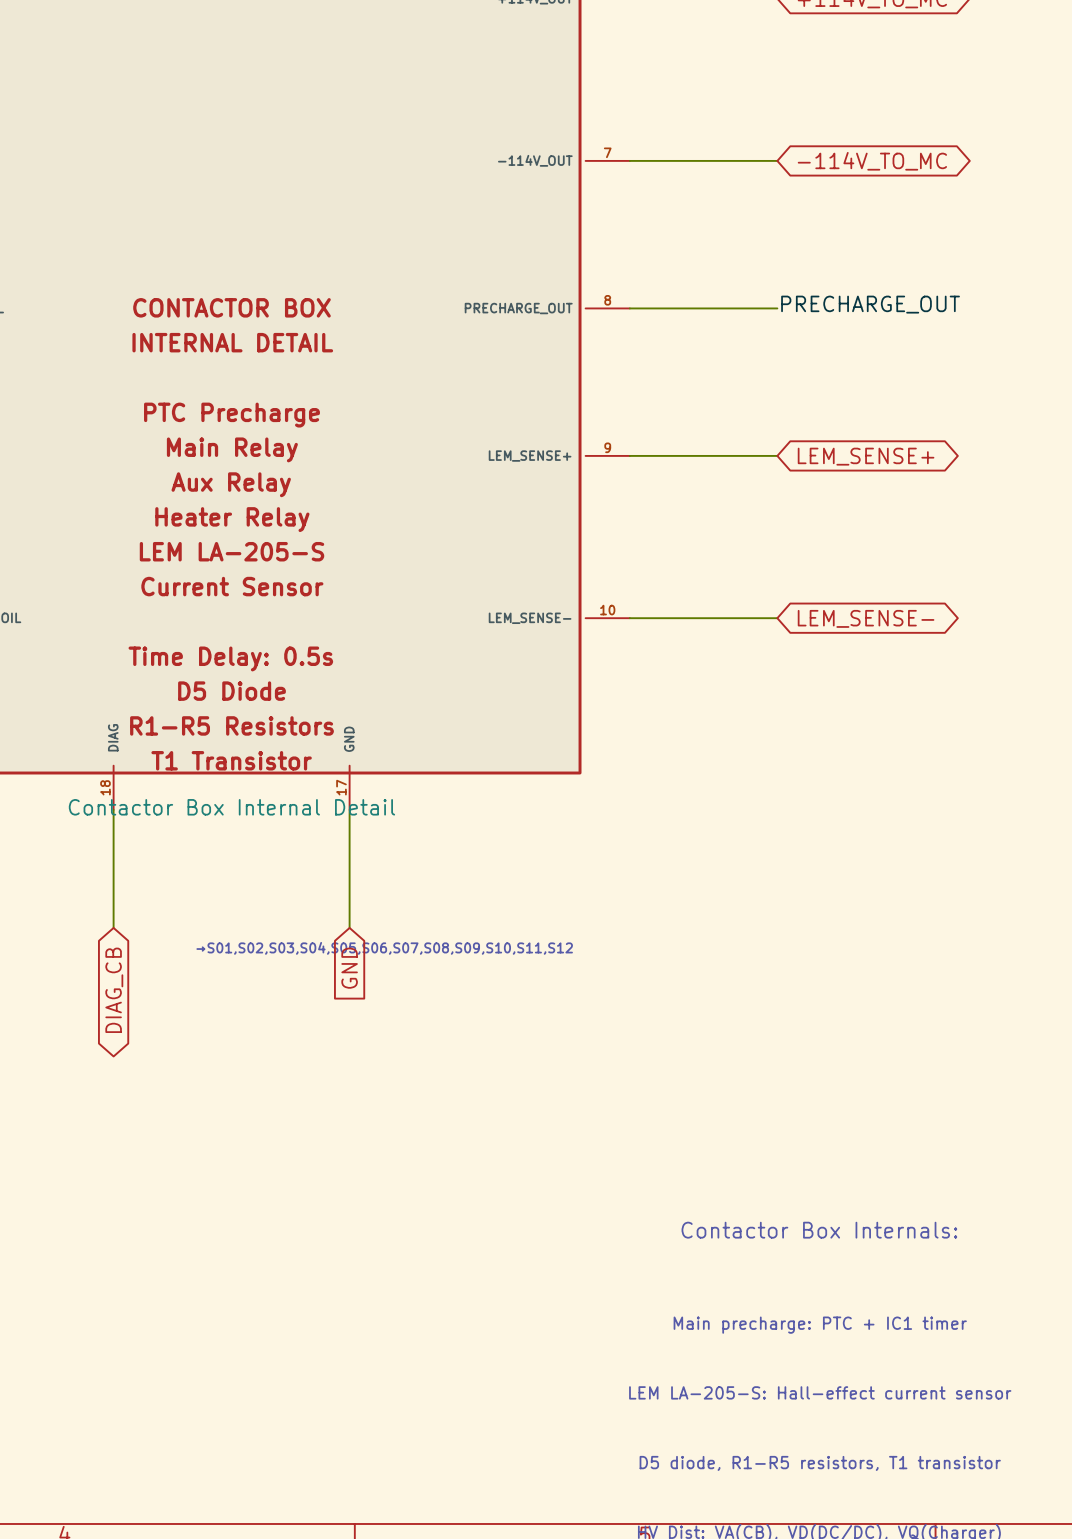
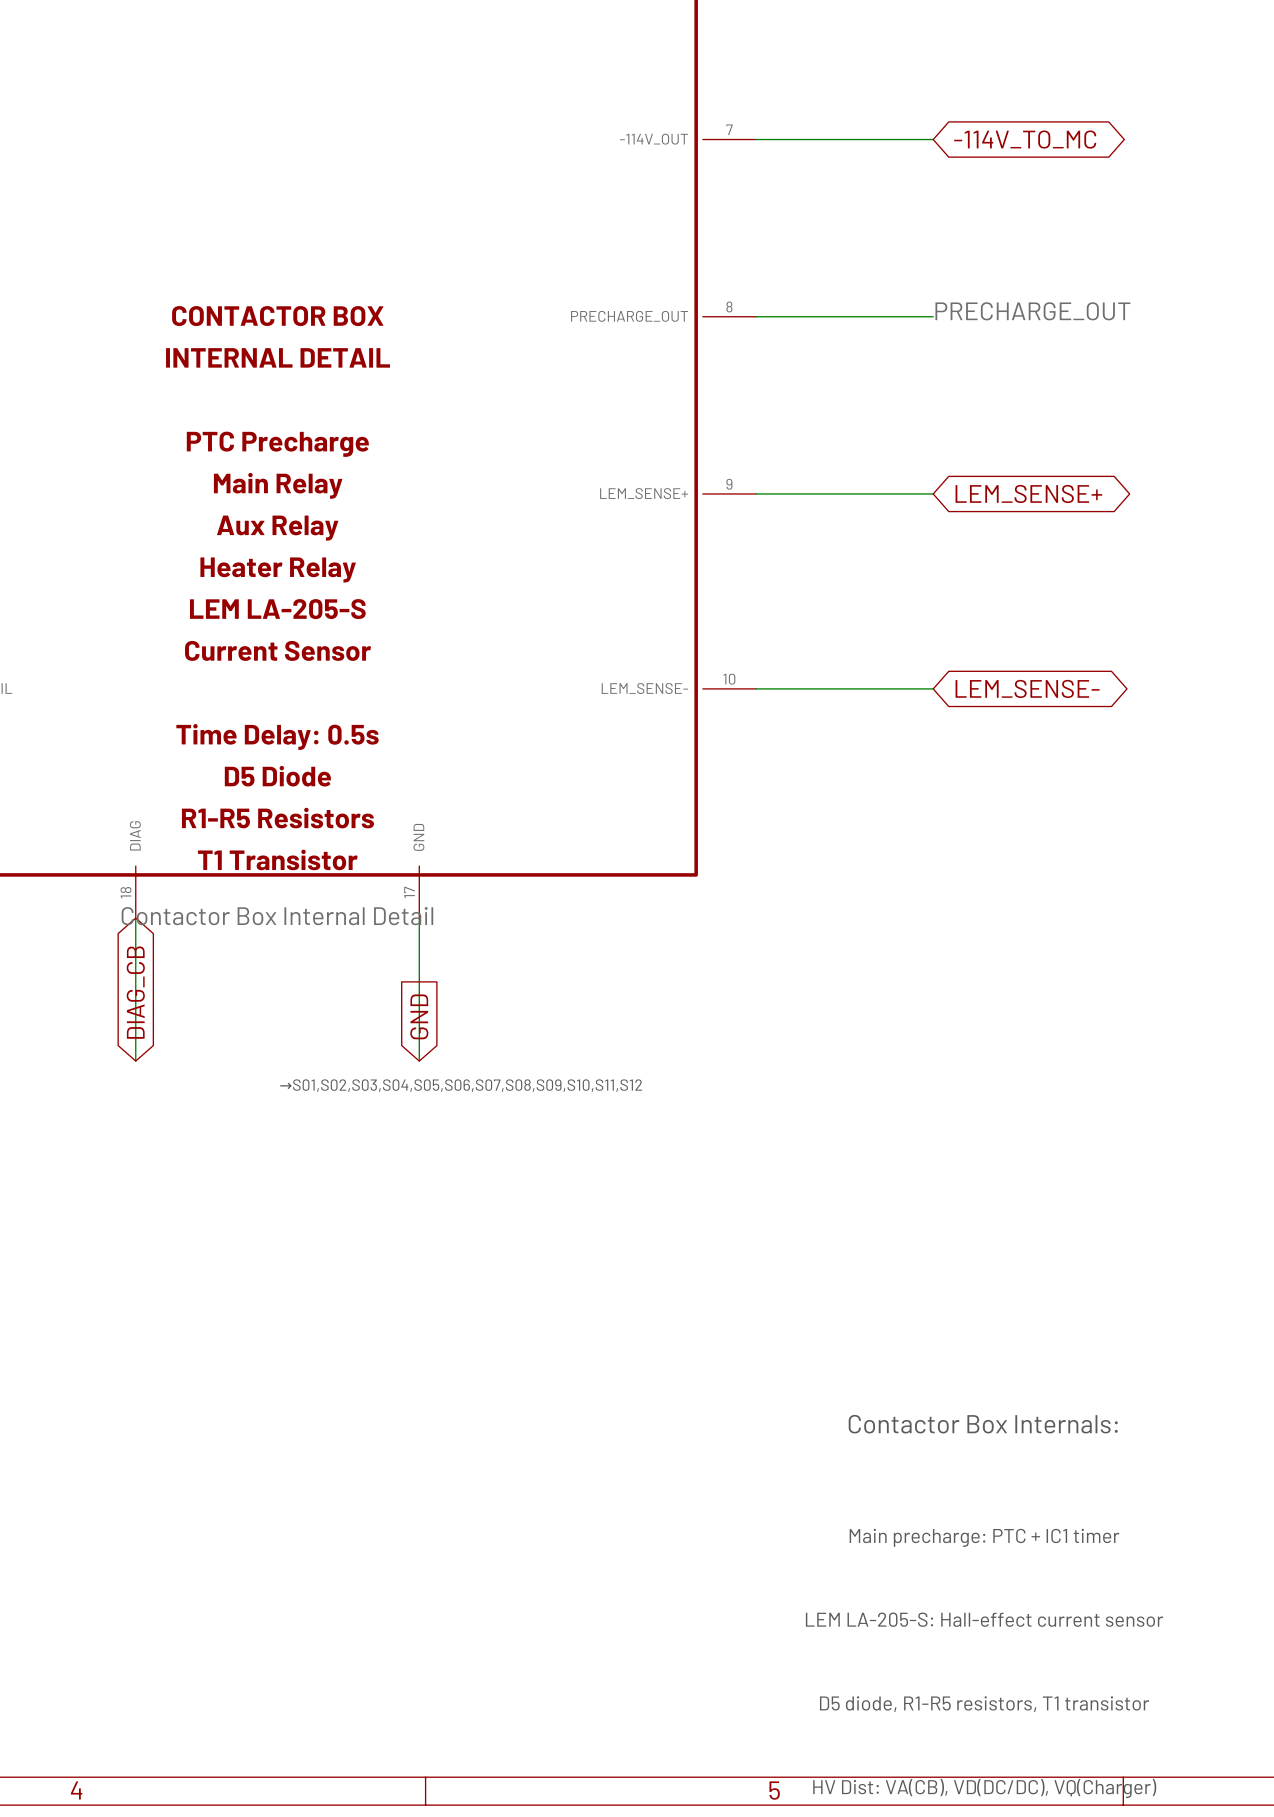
global label rotation: 0° (349, 968) -> 180° (419, 1016)
global label rotation: 0° (114, 990) -> 180° (135, 992)
global label position: DIAG_CB (114, 990) -> DIAG_CB (135, 992)

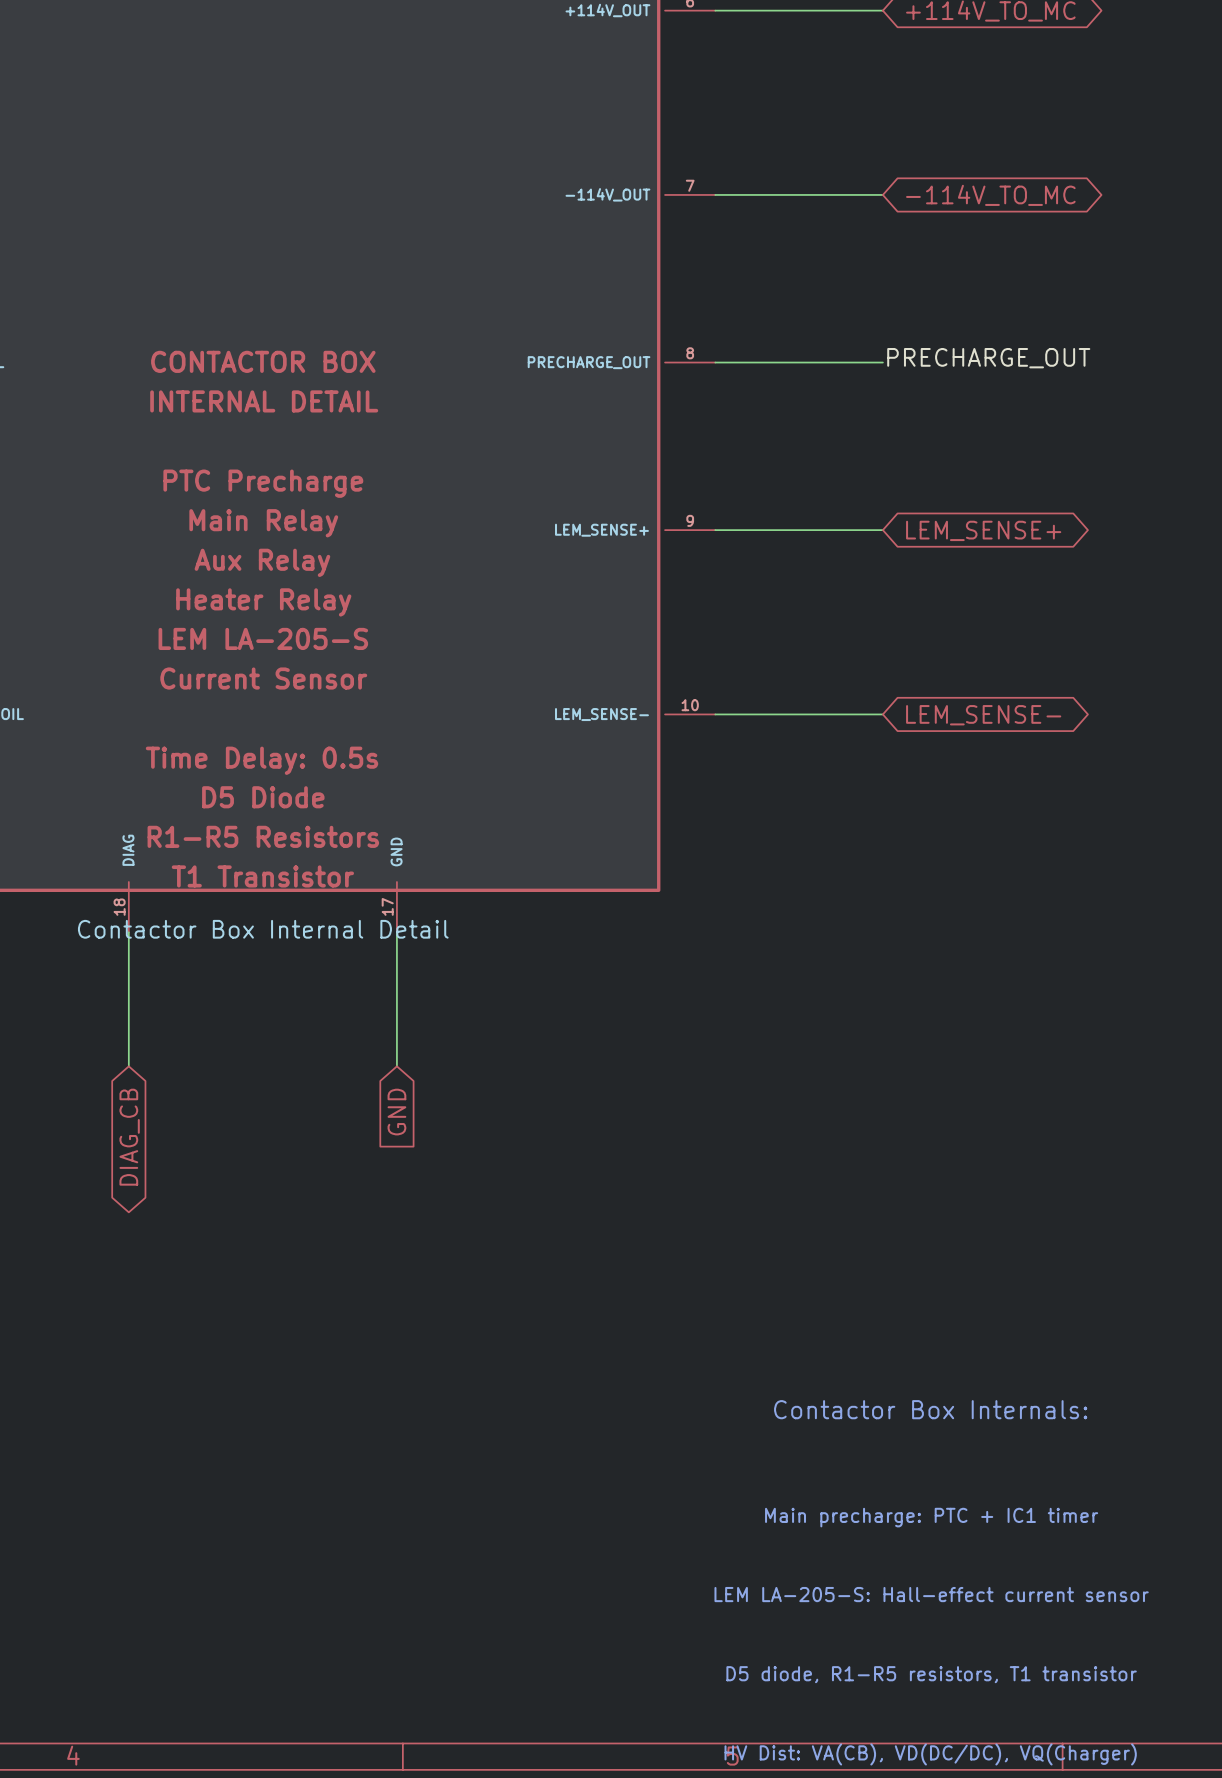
global label rotation: 0° (135, 992) -> 180° (129, 1137)
global label position: DIAG_CB (135, 992) -> DIAG_CB (129, 1137)
global label rotation: 0° (419, 1016) -> 180° (396, 1112)
text: →S01,S02,S03,S04,S05,S06,S07,S08,S09,S10,S11,S12 (461, 1085) -> none

